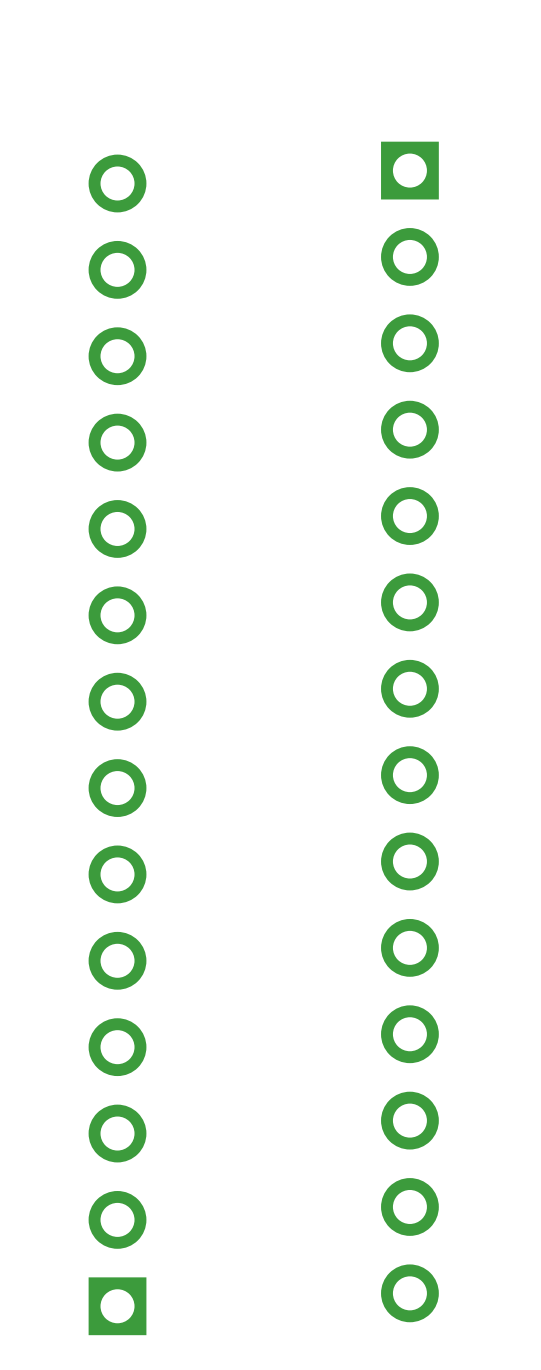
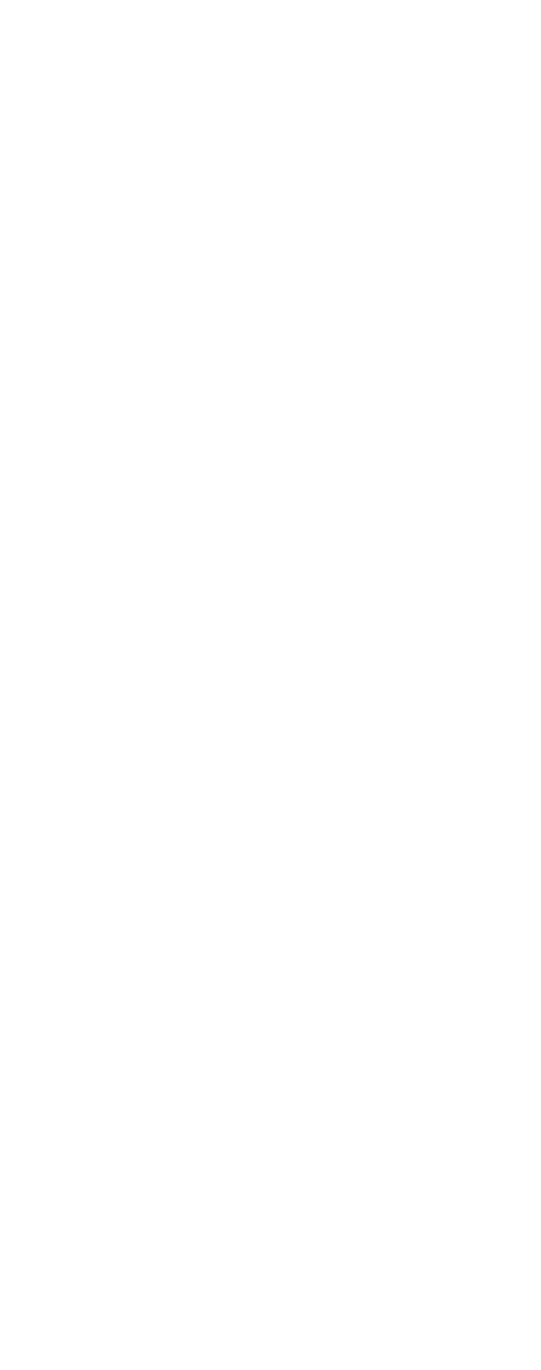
part: (409, 731) -> none
part: (117, 744) -> none

